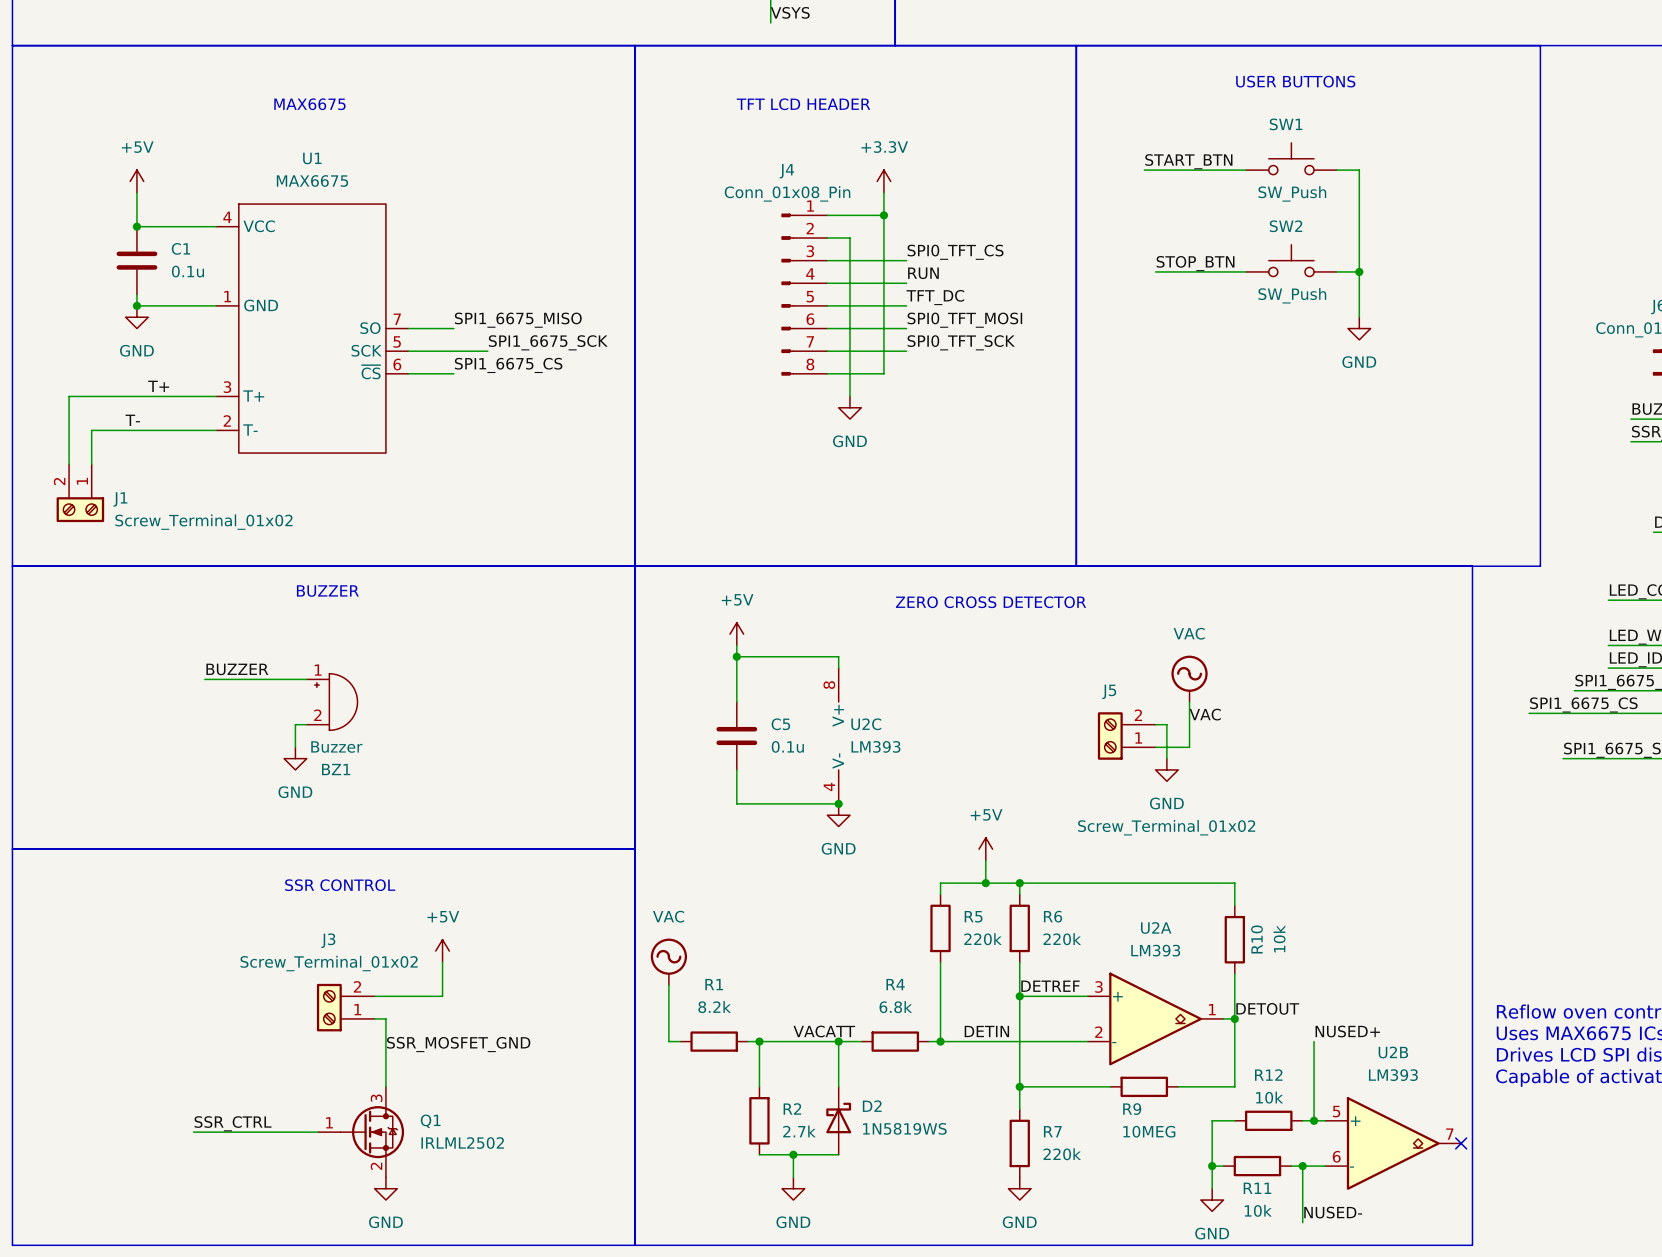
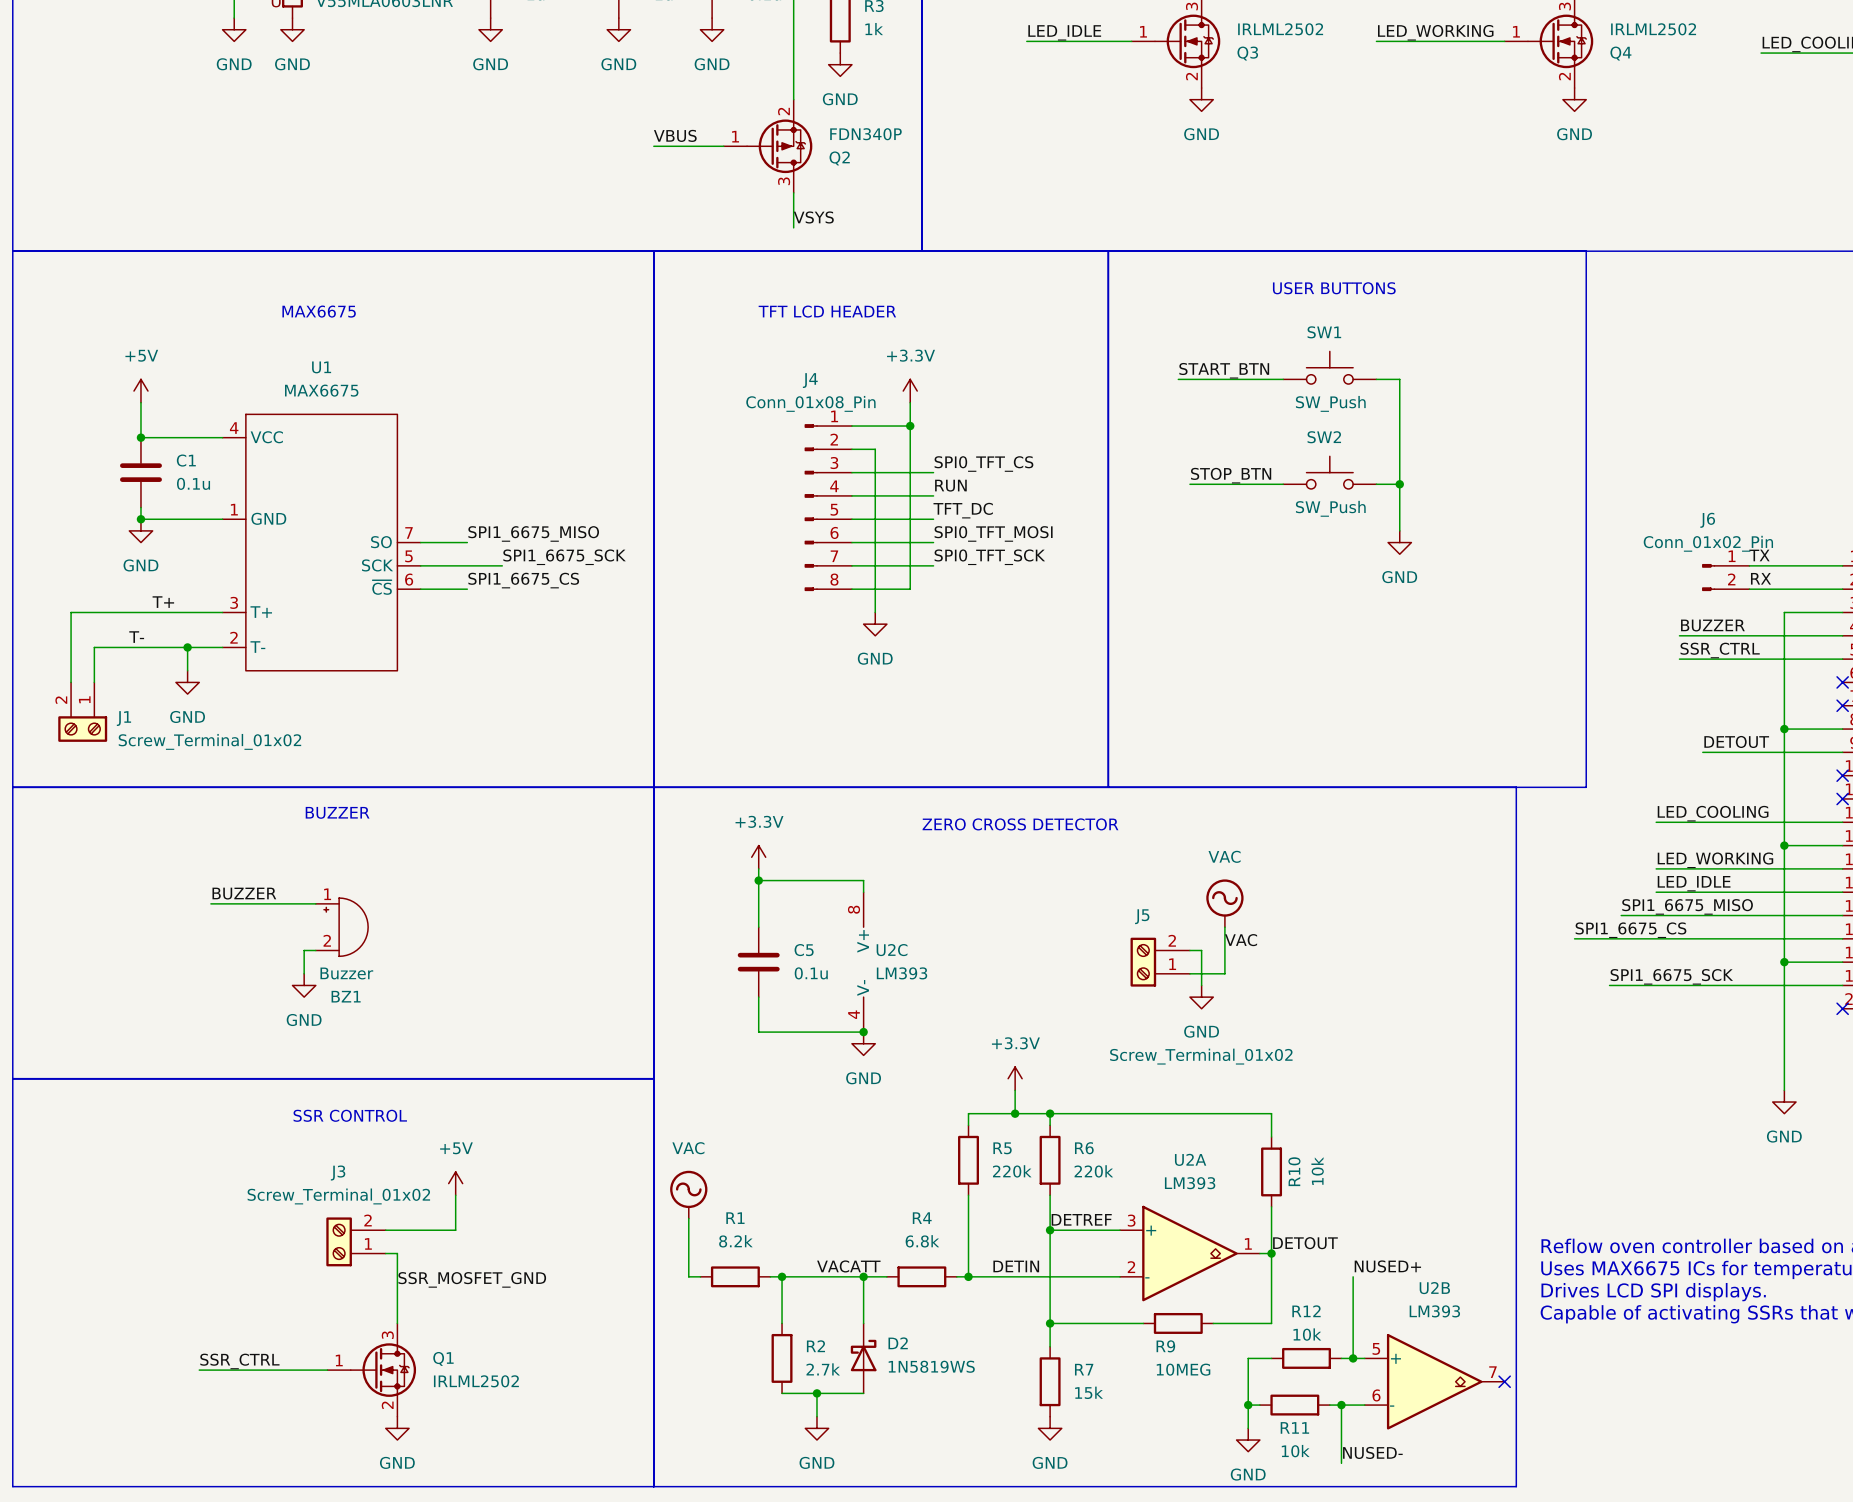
wire: none -> (187, 647) (187, 670)
junction: none -> (187, 647)
power symbol: none -> GND (187, 682)
power symbol: +5V (736, 634) -> +3.3V (758, 857)
power symbol: +5V (985, 849) -> +3.3V (1015, 1078)
R7 value: 220k (1062, 1154) -> 15k (1089, 1392)

